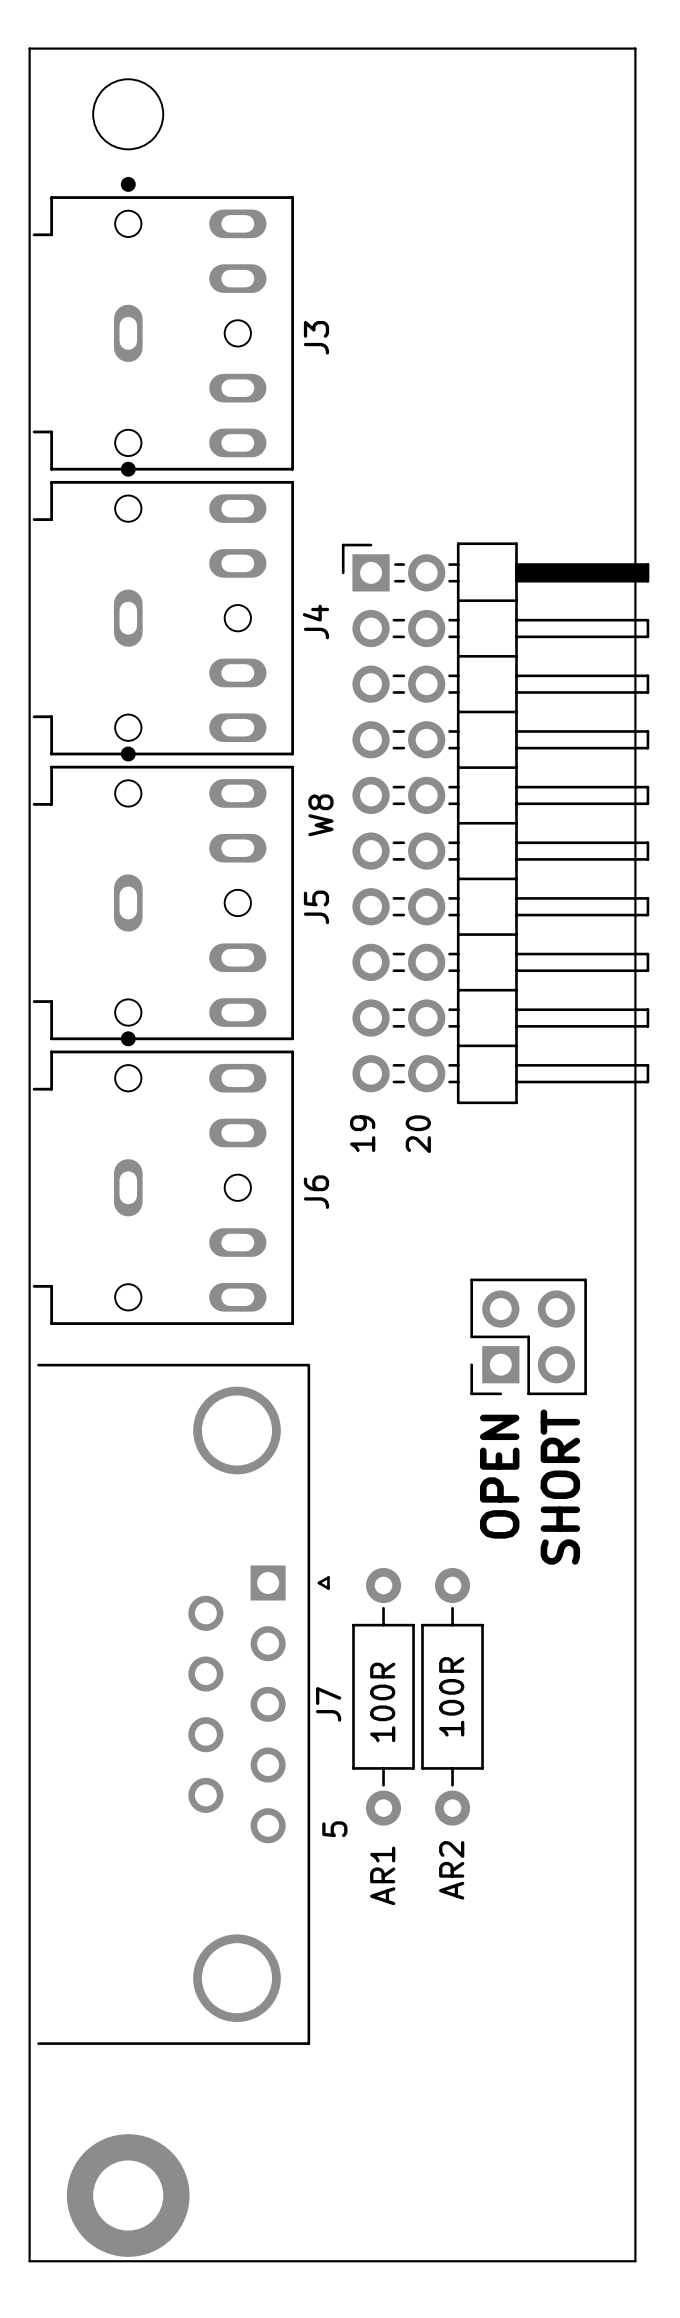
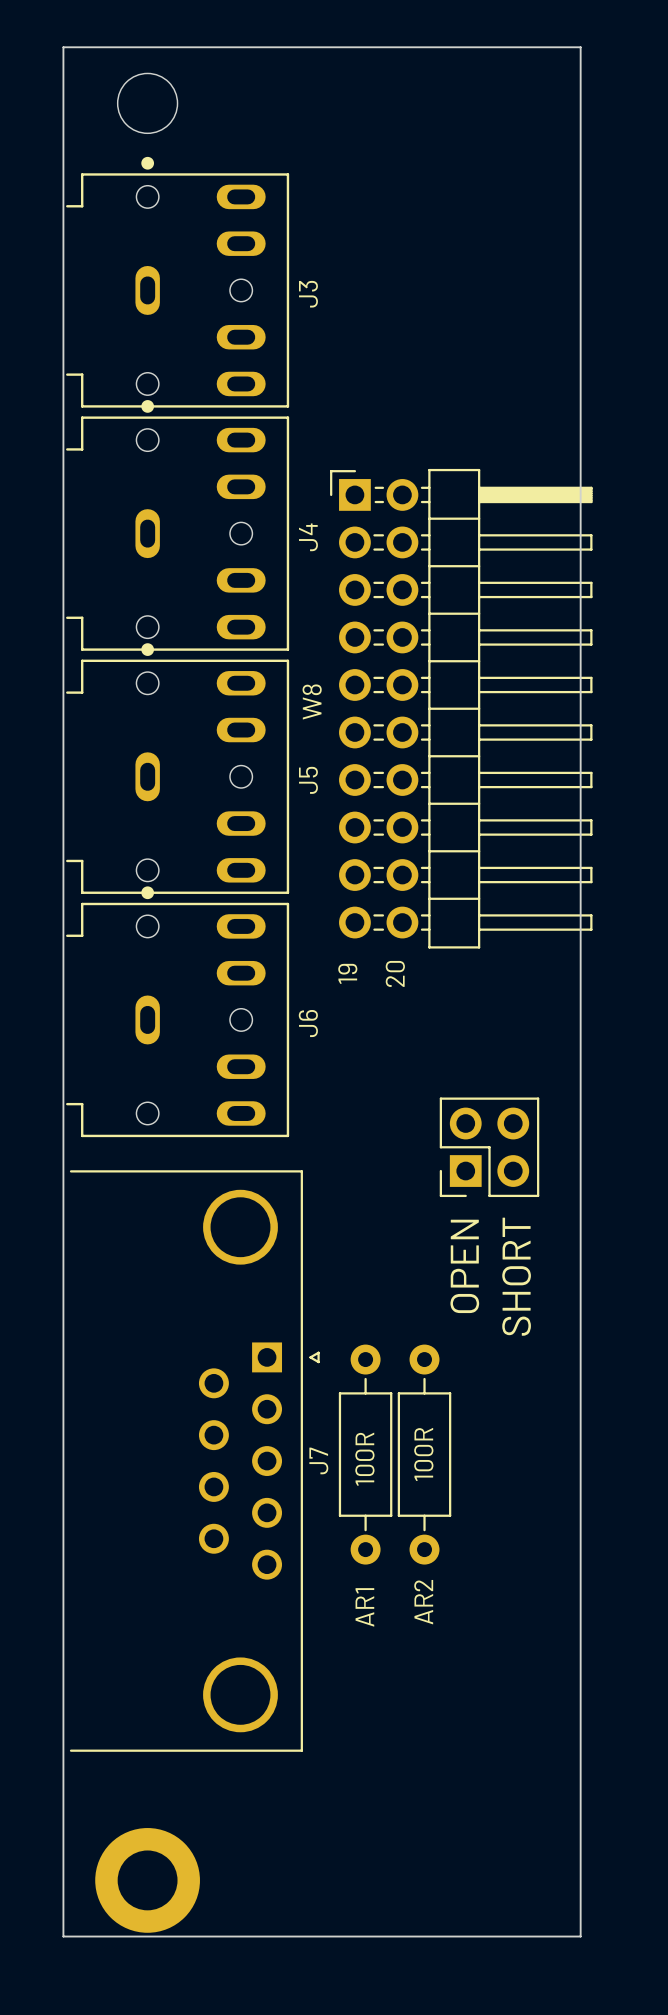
text: 5 (334, 1829) -> none

